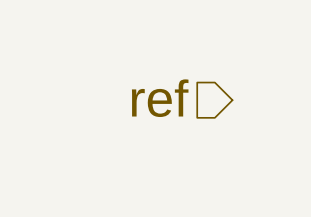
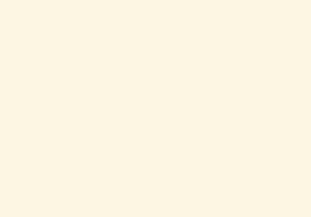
hierarchical label: ref (160, 98) -> none

